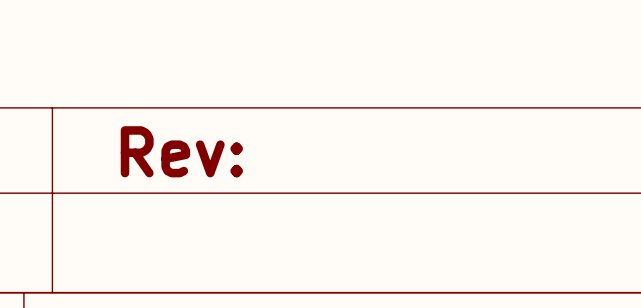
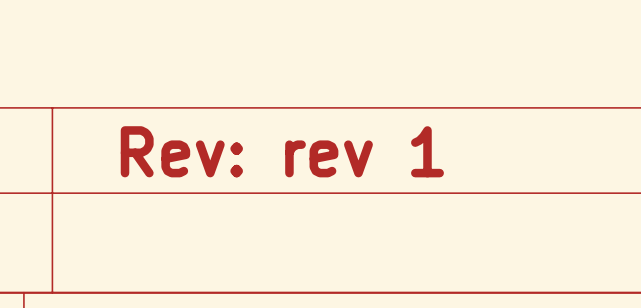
title block: Rev: (181, 151) -> Rev: rev 1 (282, 151)

